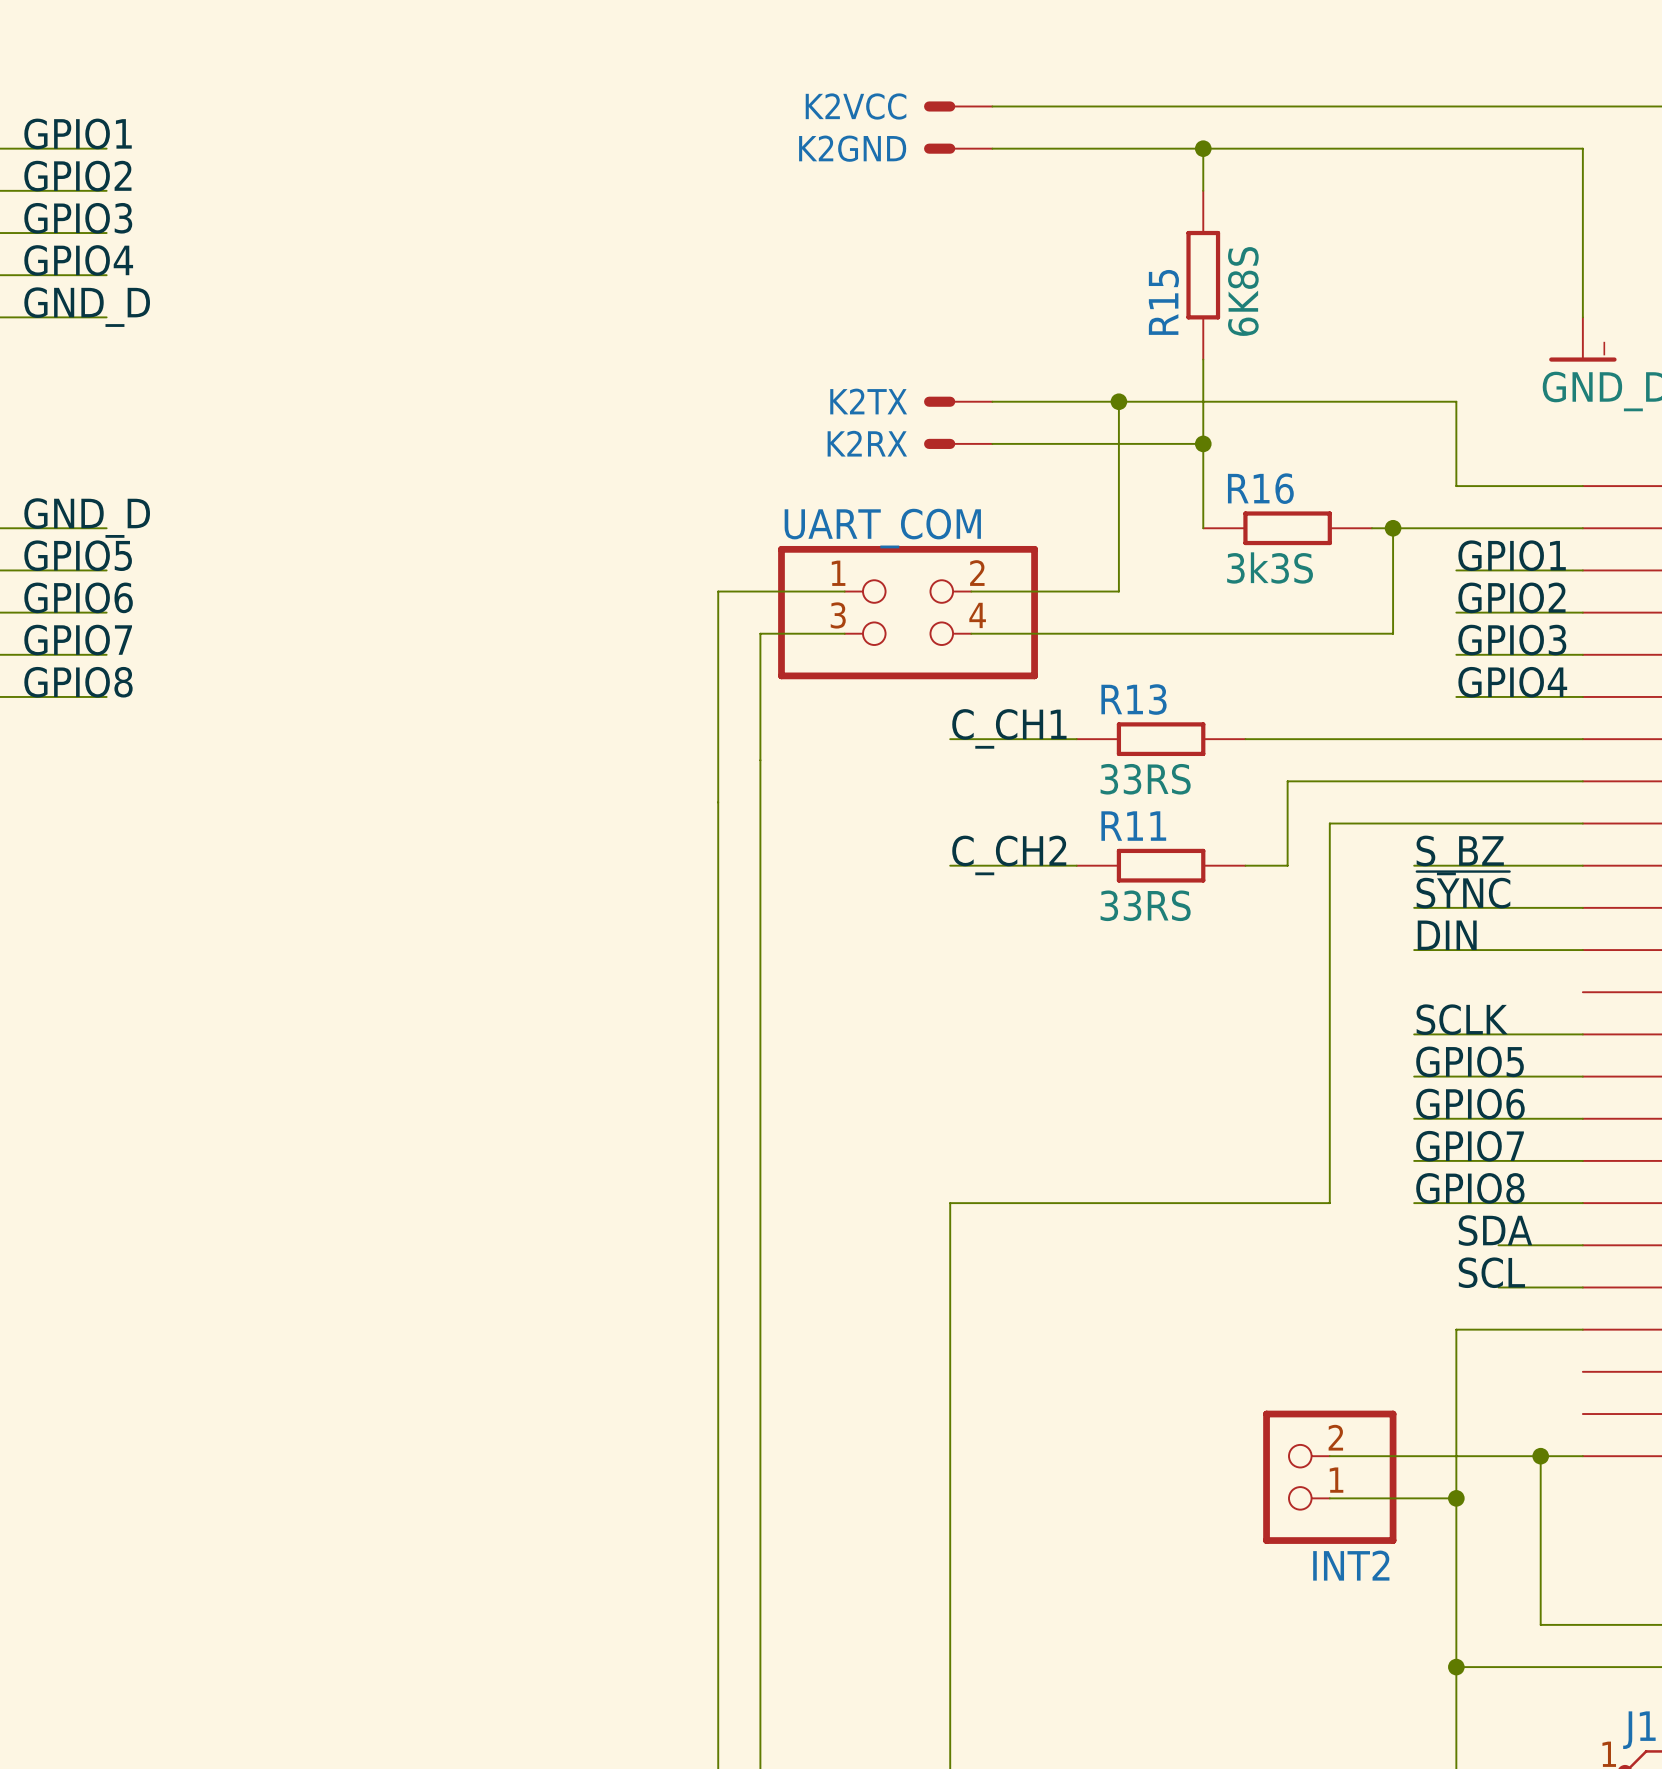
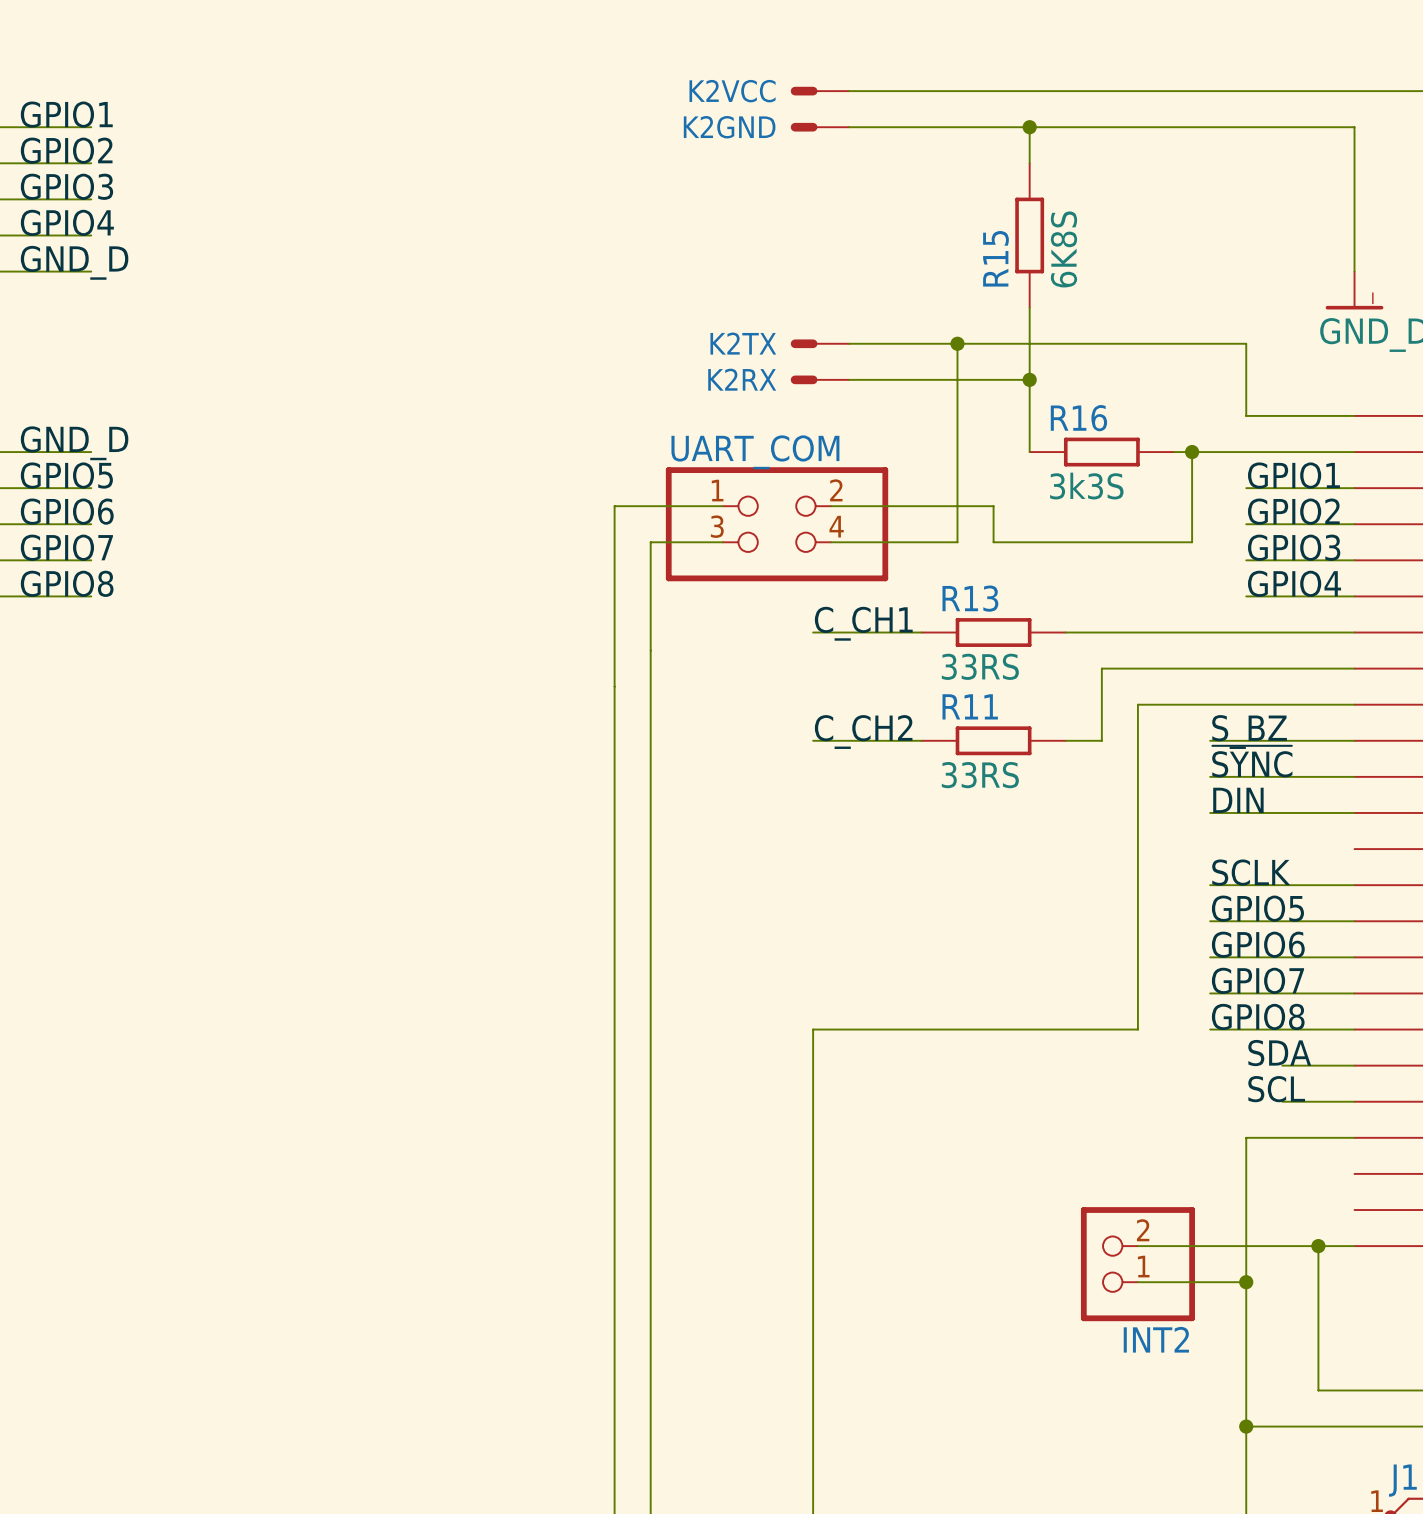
wire: (1118, 633) (1161, 633) -> (957, 542) (957, 506) (993, 506) (993, 542)

